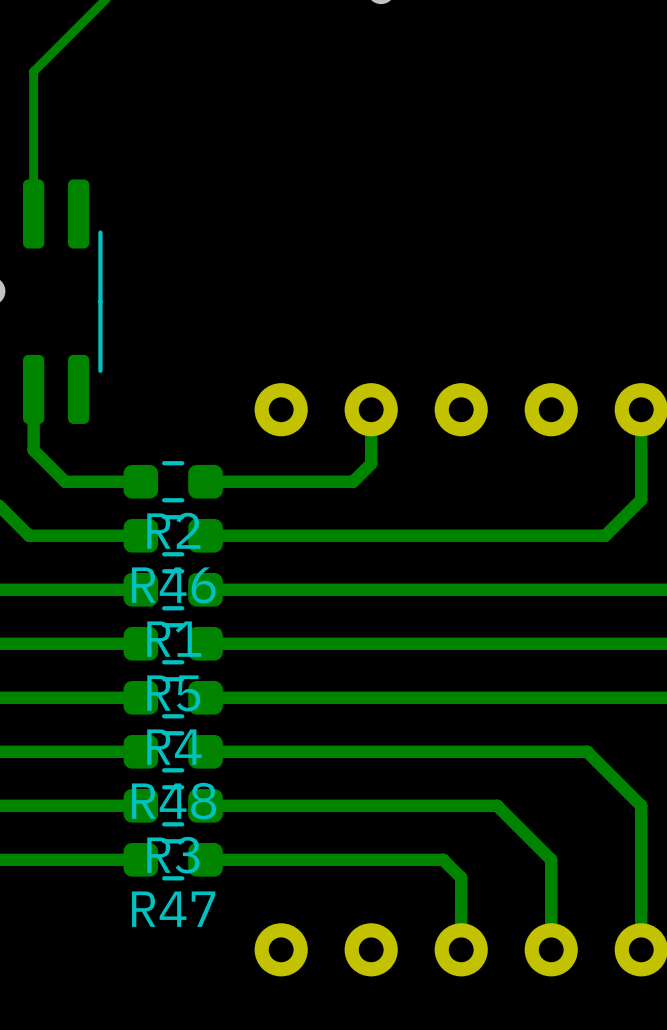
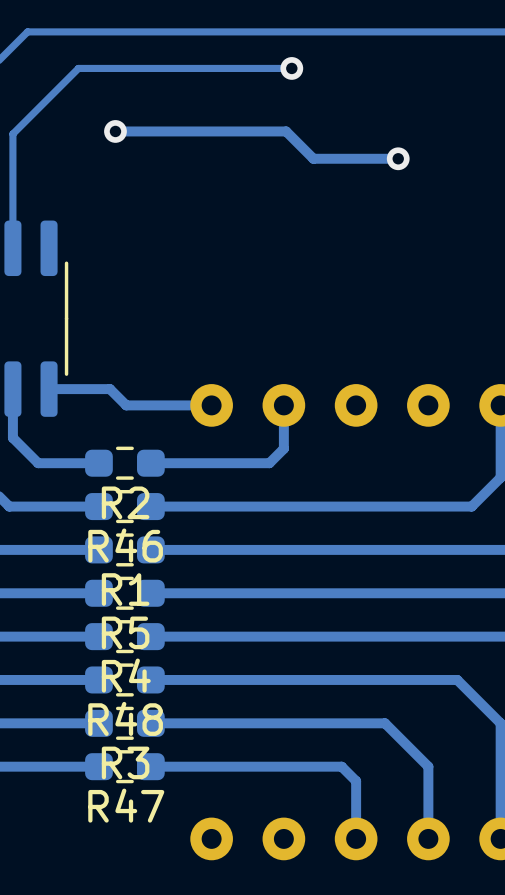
track: none -> (115, 131) (286, 131) (313, 158) (398, 158)
via: none -> (115, 131)
via: none -> (398, 158)
track: none -> (49, 389) (109, 389) (126, 405) (211, 405)

